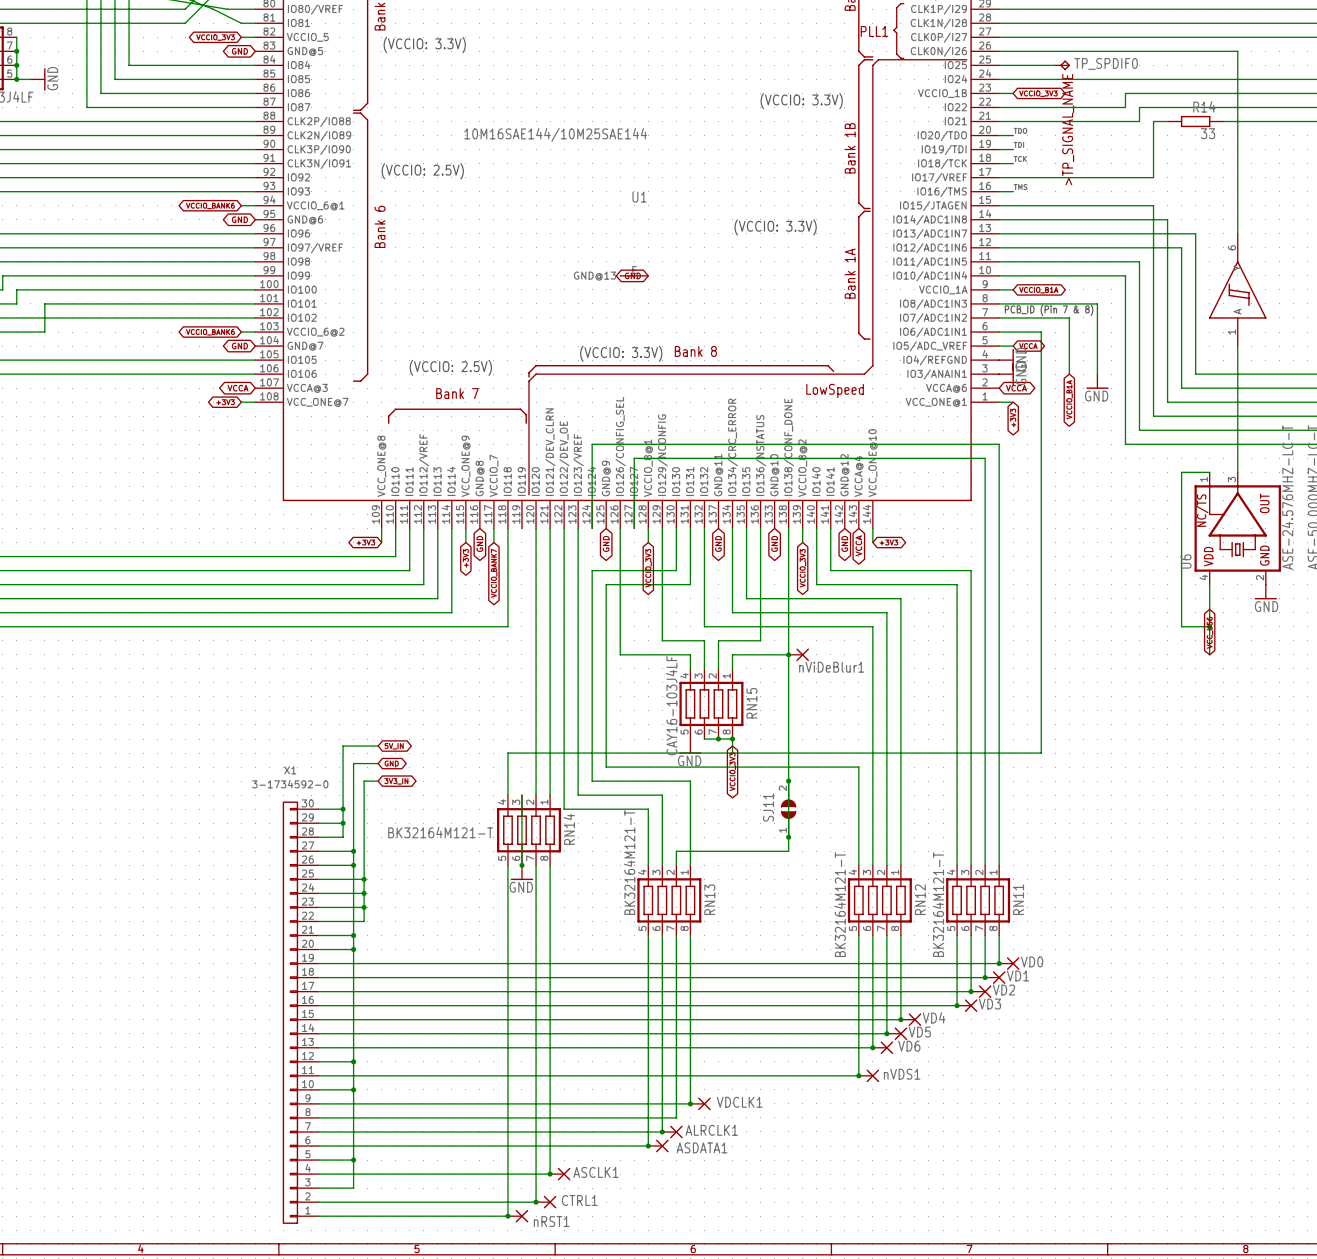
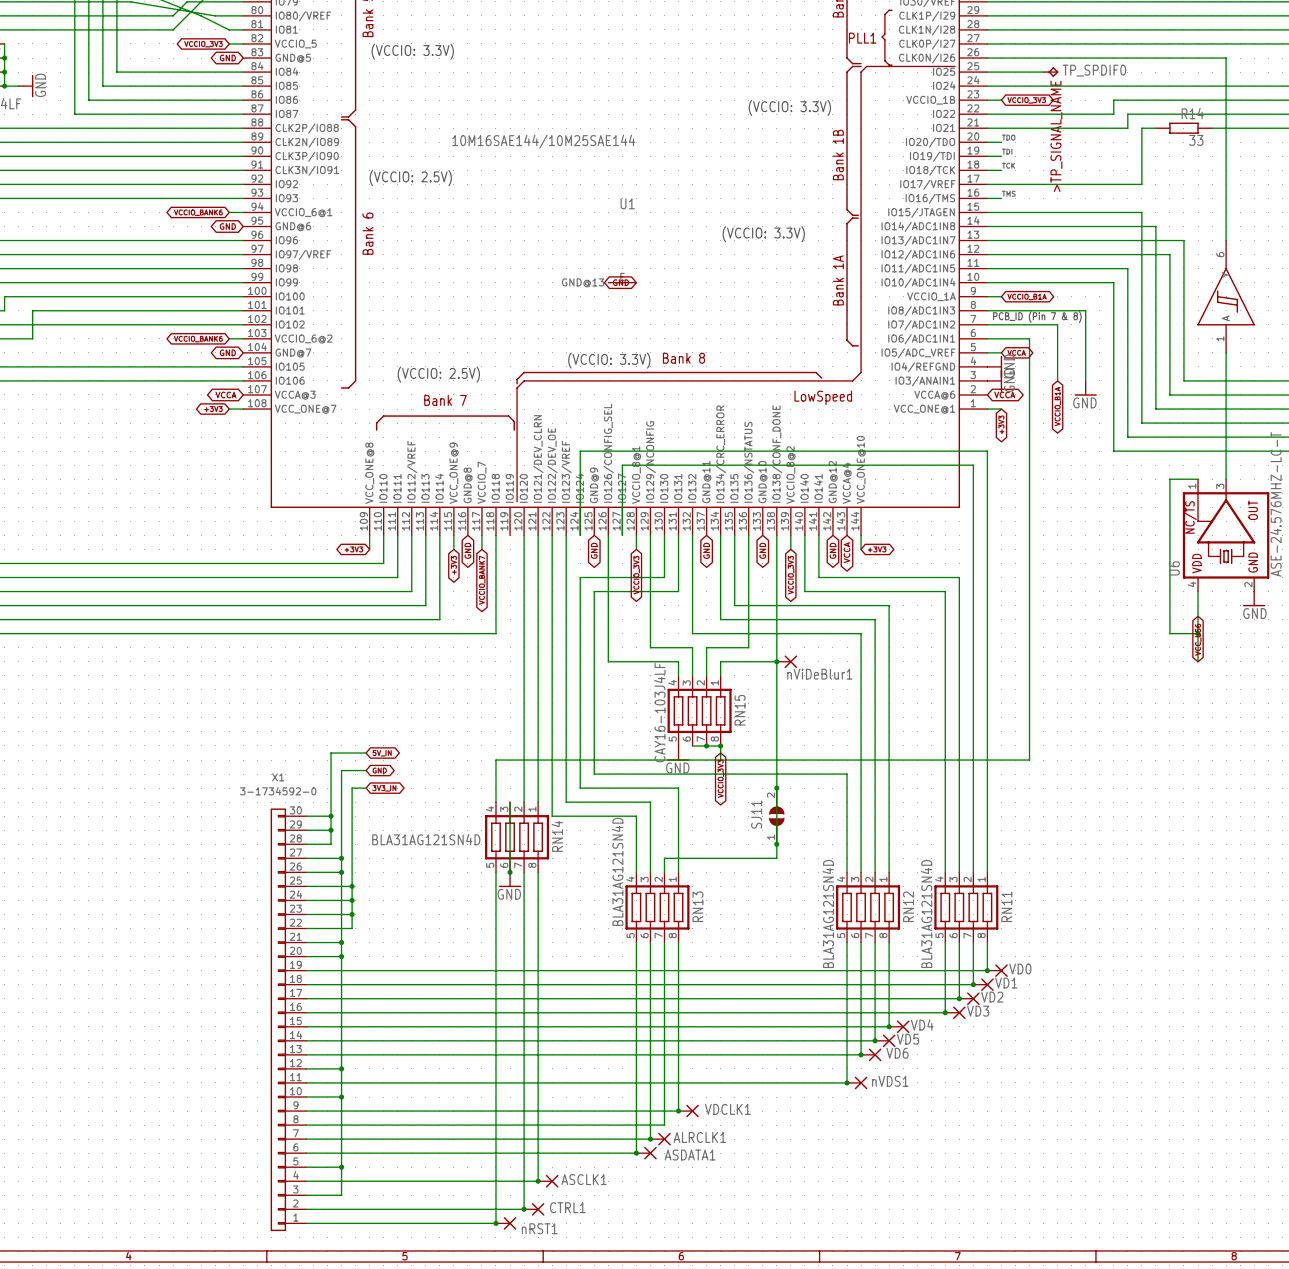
RN14 value: BK32164M121-T (440, 832) -> BLA31AG121SN4D (426, 839)
RN13 value: BK32164M121-T (629, 862) -> BLA31AG121SN4D (617, 871)
RN12 value: BK32164M121-T (840, 904) -> BLA31AG121SN4D (828, 913)
RN11 value: BK32164M121-T (938, 904) -> BLA31AG121SN4D (926, 913)

